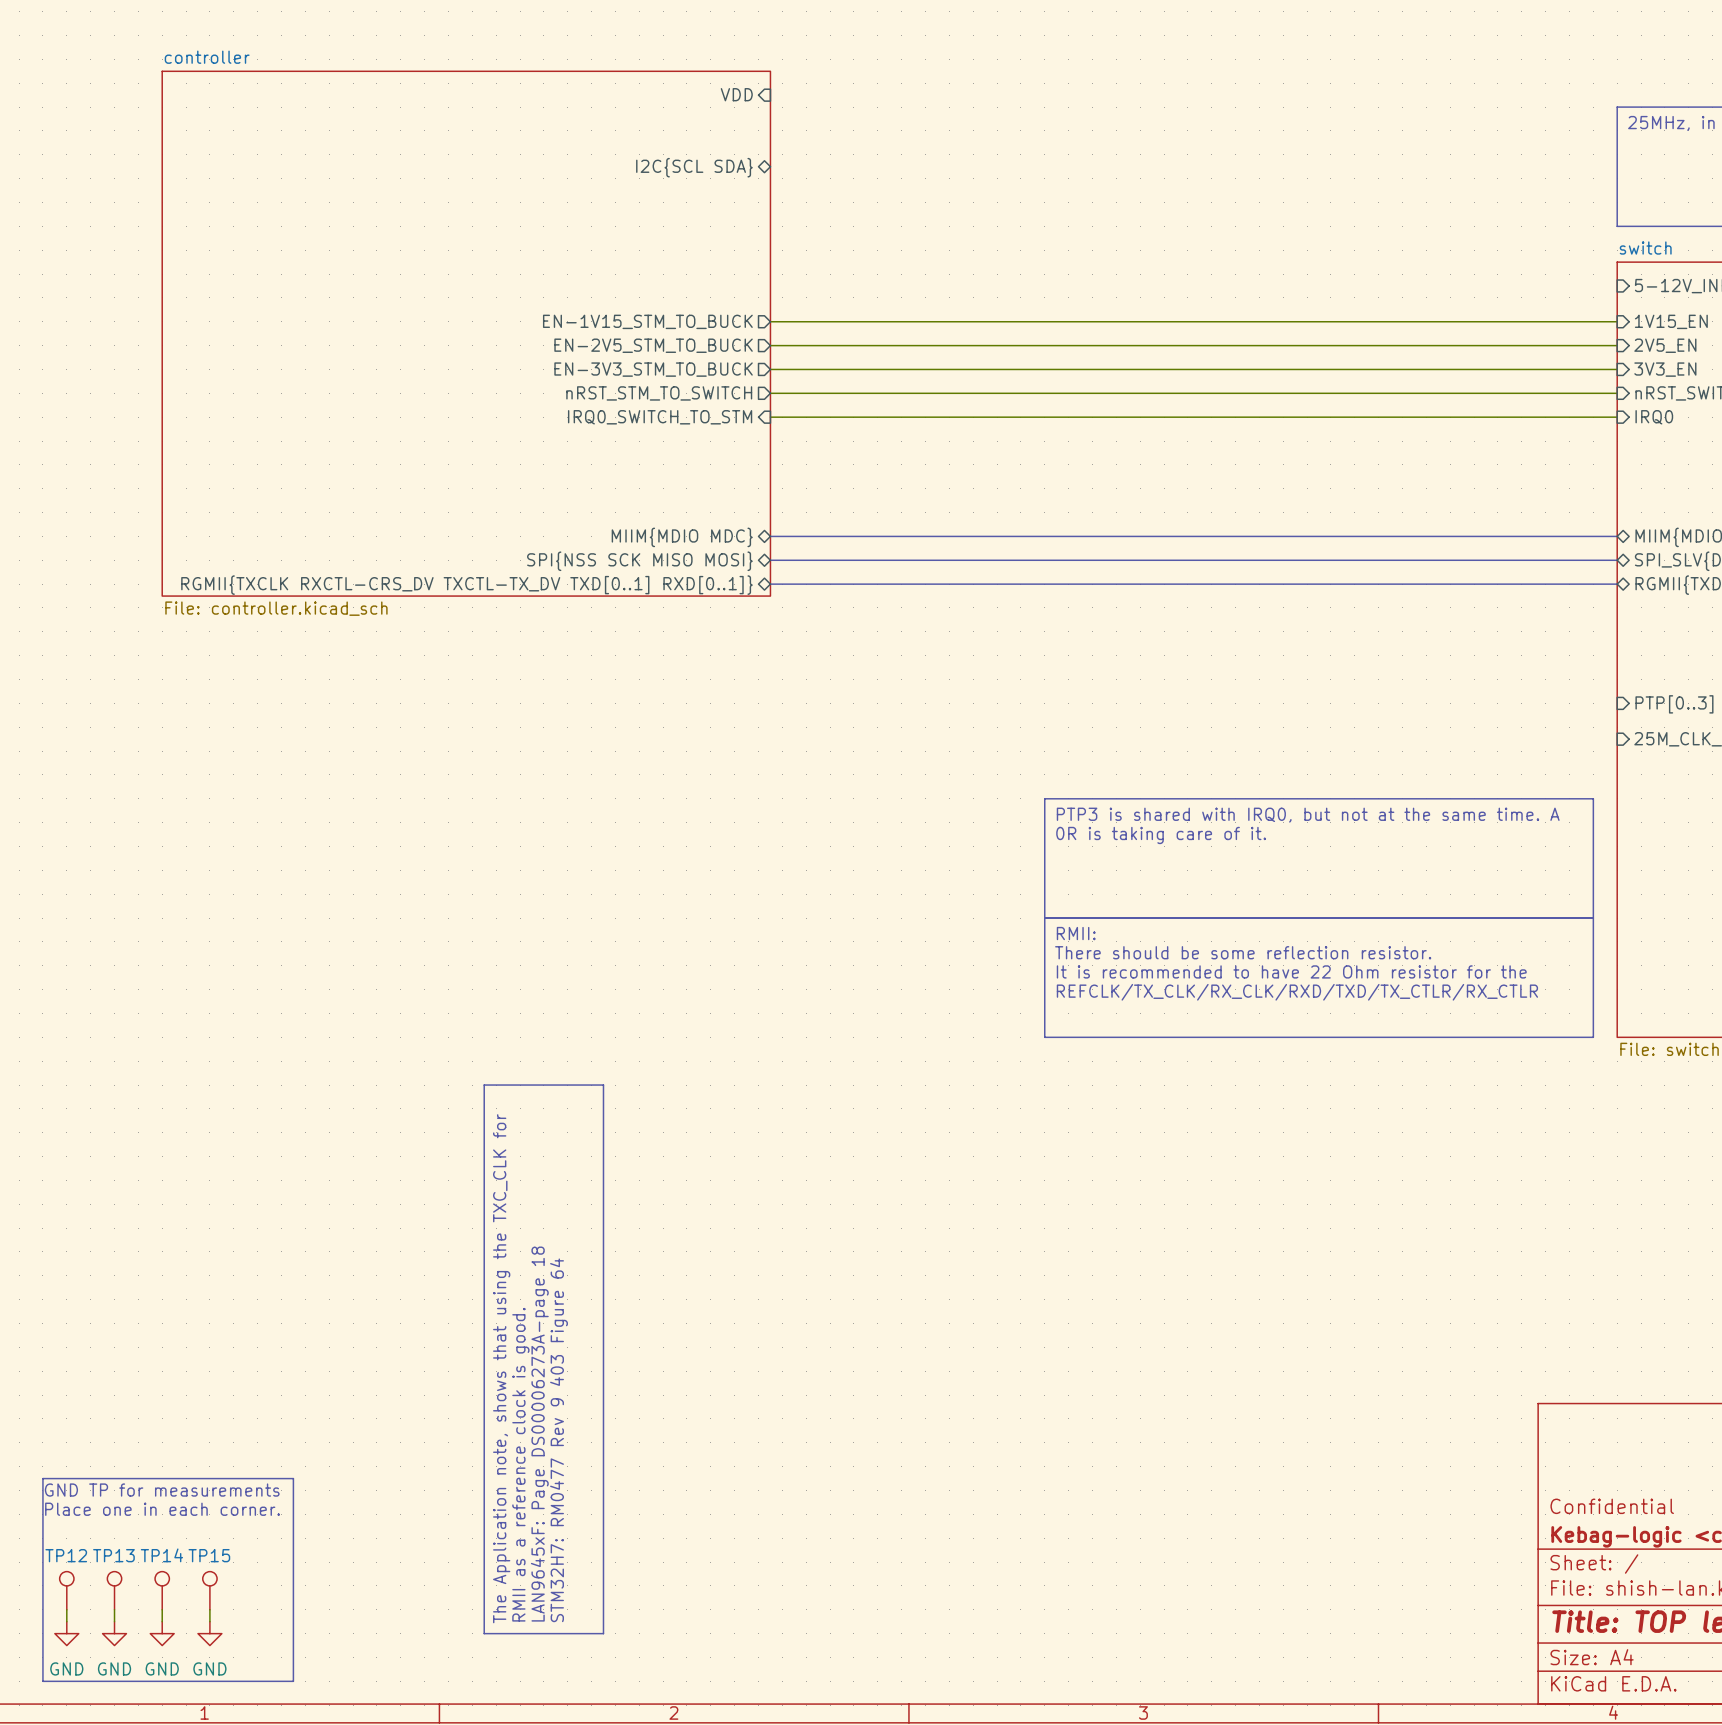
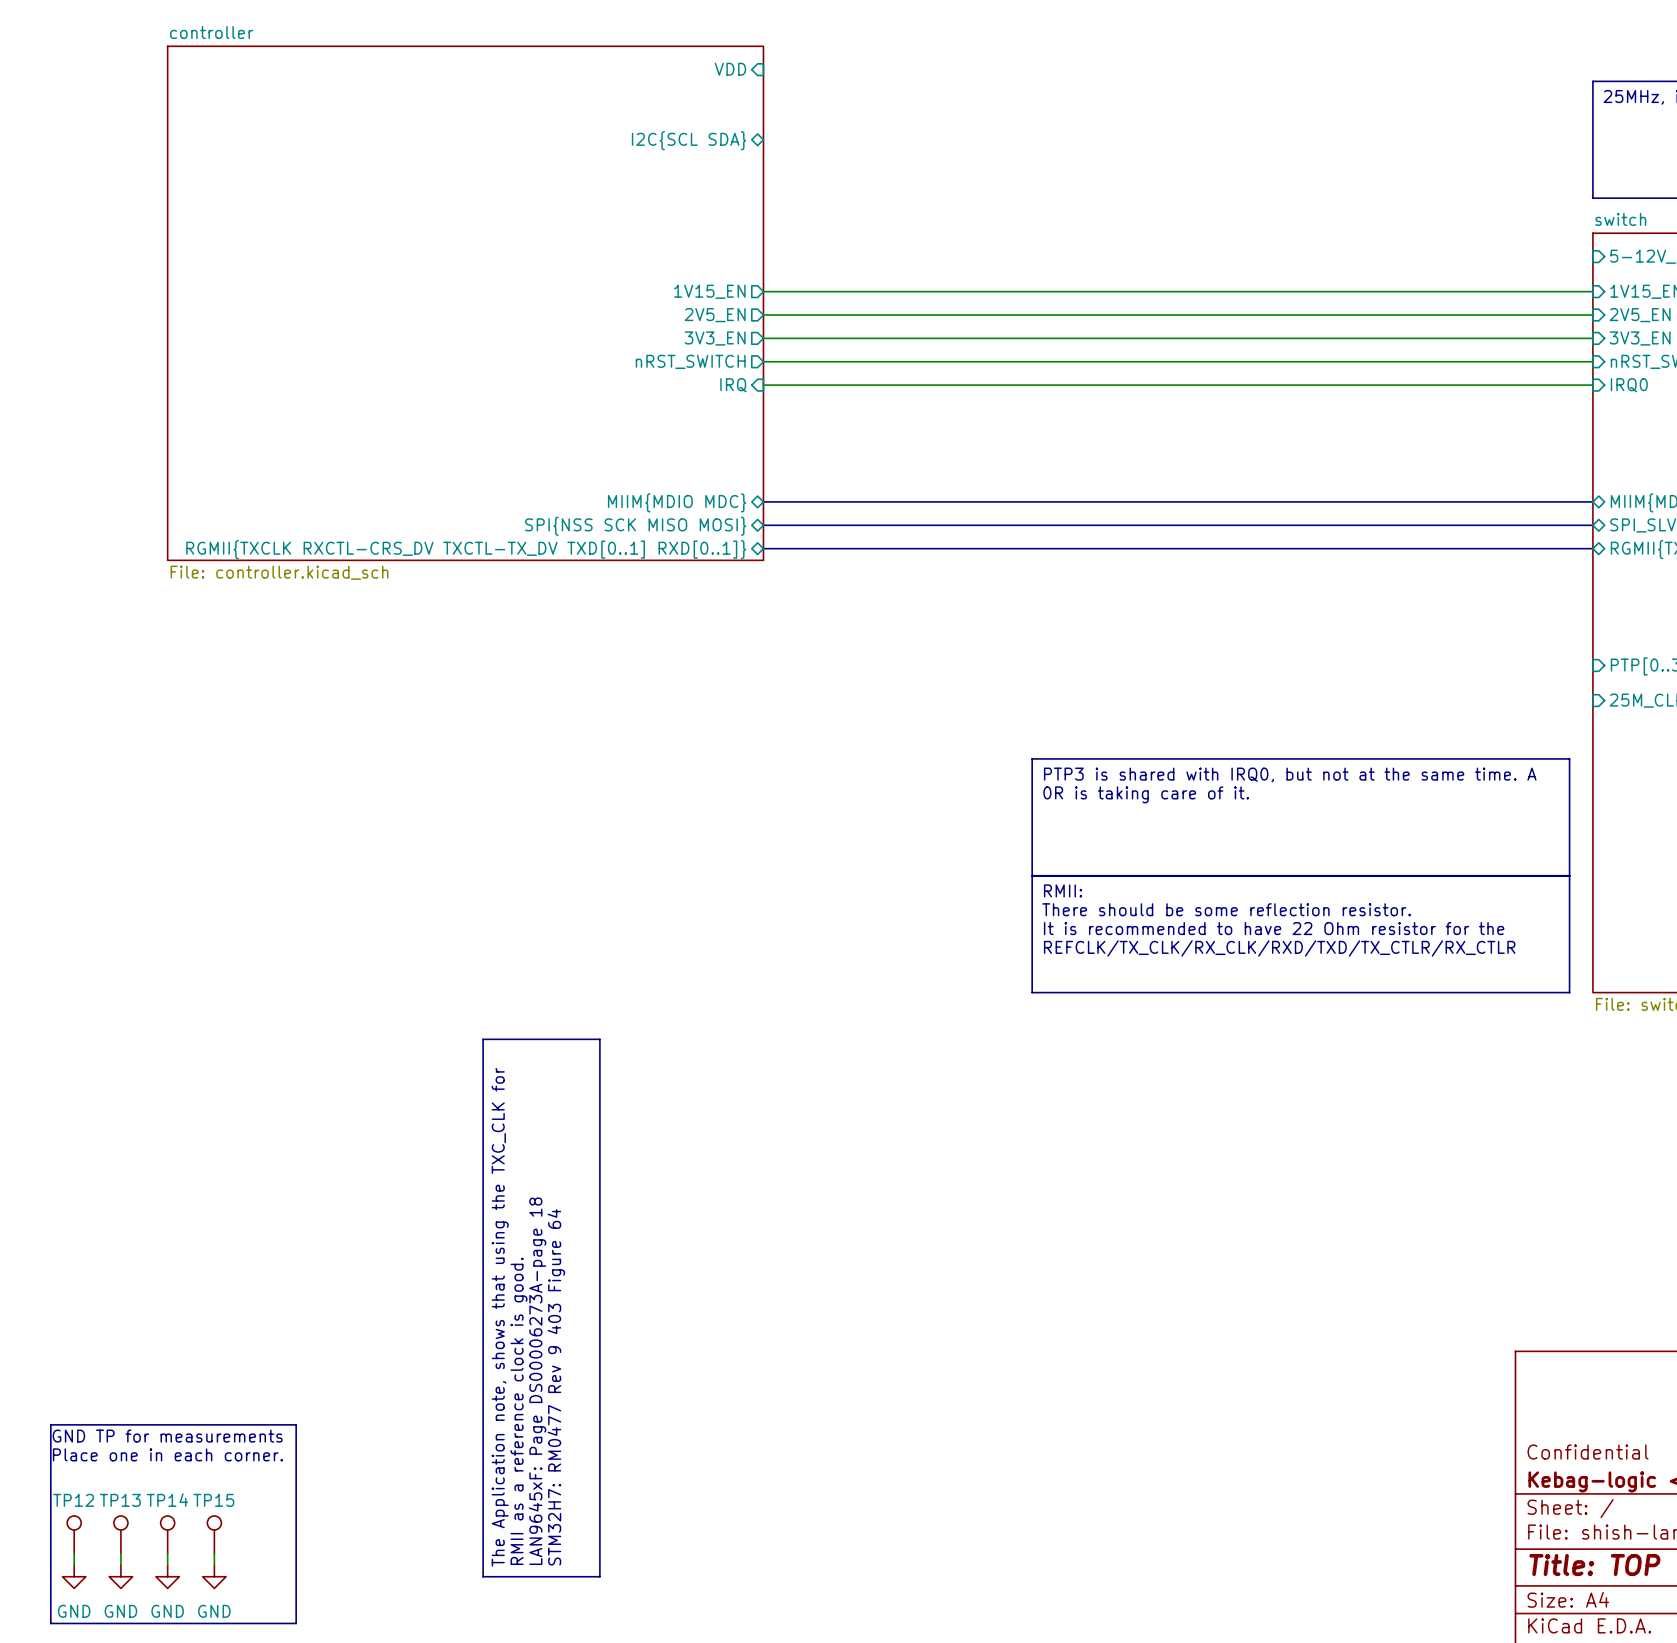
sheet pin: EN-1V15_STM_TO_BUCK (647, 321) -> 1V15_EN (709, 291)
sheet pin: EN-2V5_STM_TO_BUCK (653, 345) -> 2V5_EN (715, 315)
sheet pin: EN-3V3_STM_TO_BUCK (653, 369) -> 3V3_EN (715, 338)
sheet pin: nRST_STM_TO_SWITCH (659, 393) -> nRST_SWITCH (690, 361)
sheet pin: IRQ0_SWITCH_TO_STM (660, 417) -> IRQ (733, 385)

